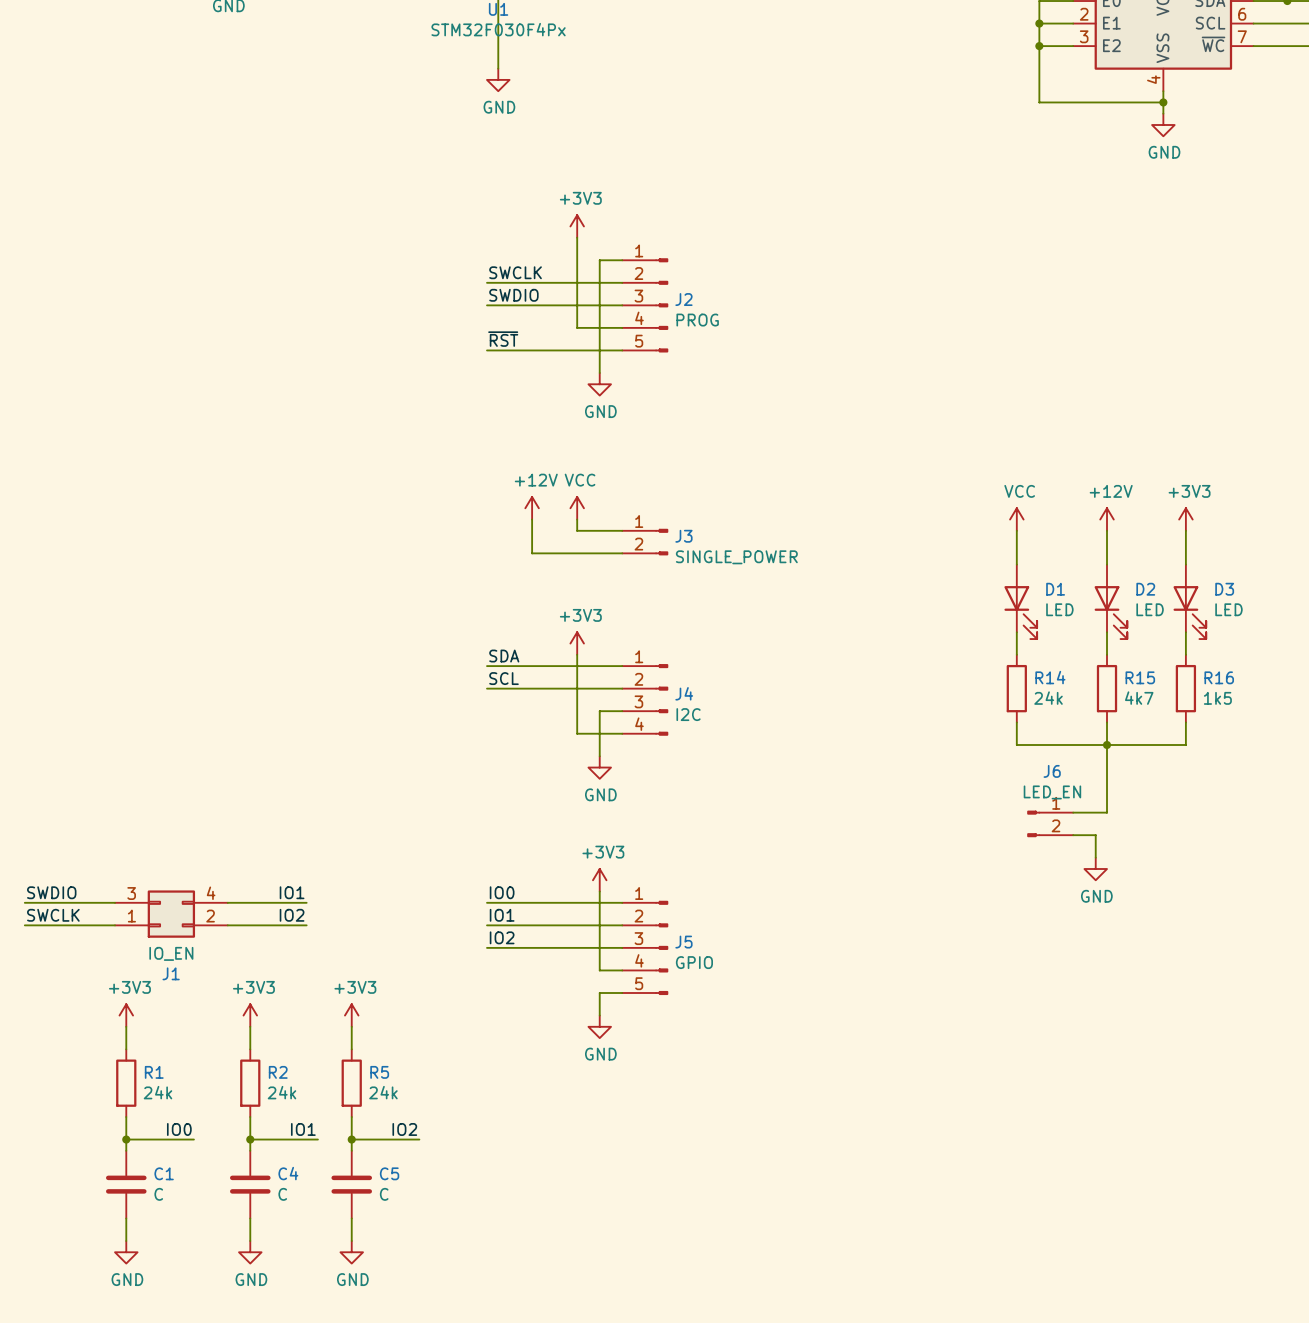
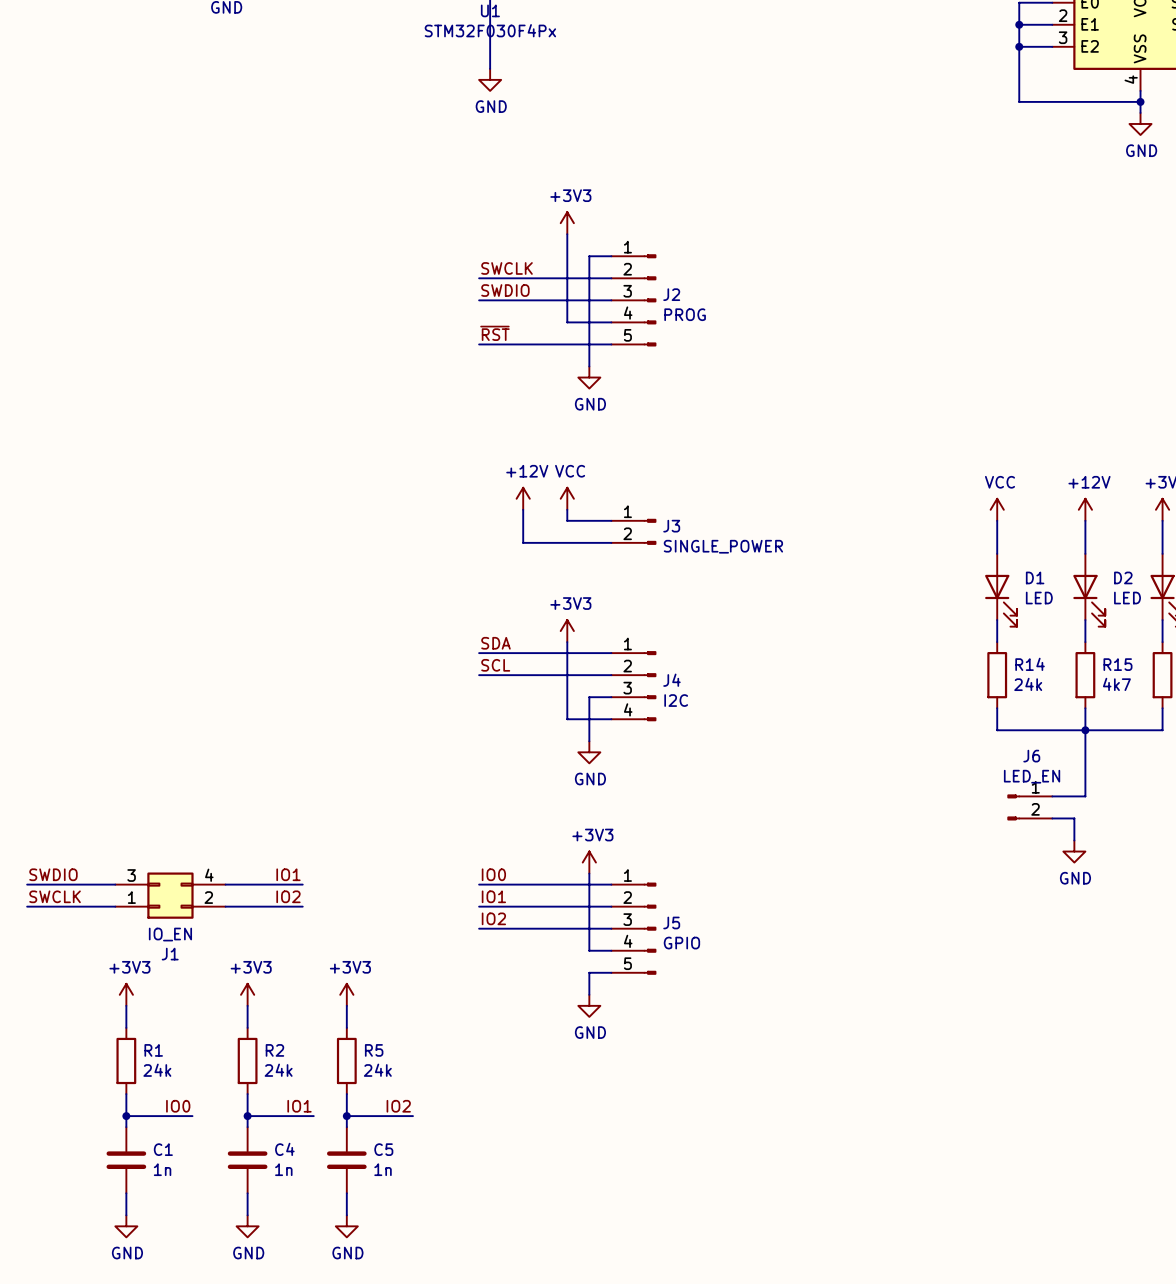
C1 value: C (158, 1194) -> 1n (162, 1169)
C4 value: C (282, 1194) -> 1n (283, 1169)
C5 value: C (384, 1194) -> 1n (383, 1169)

